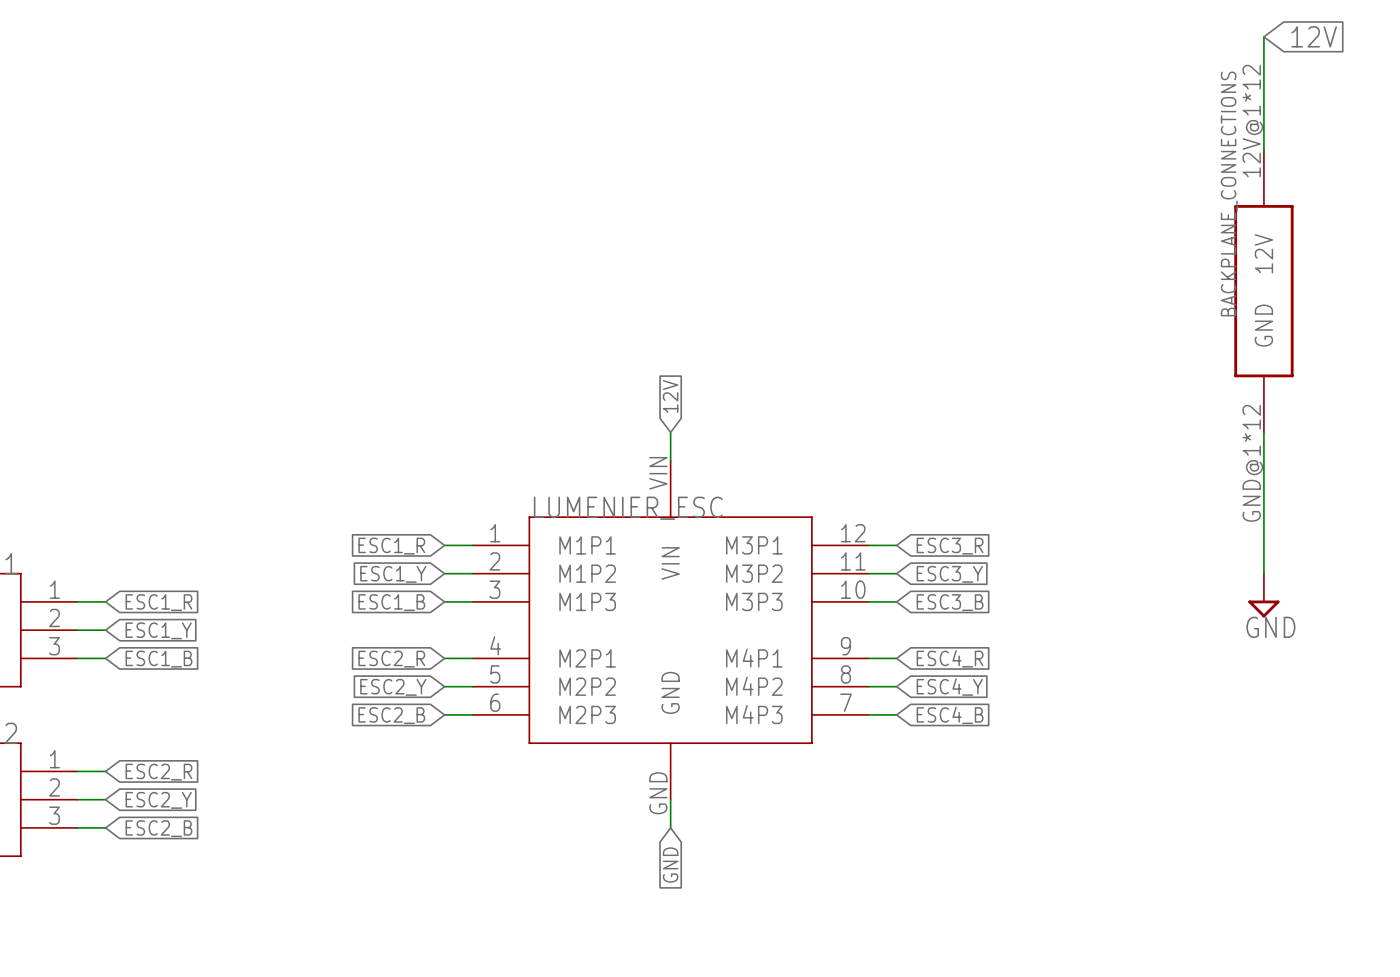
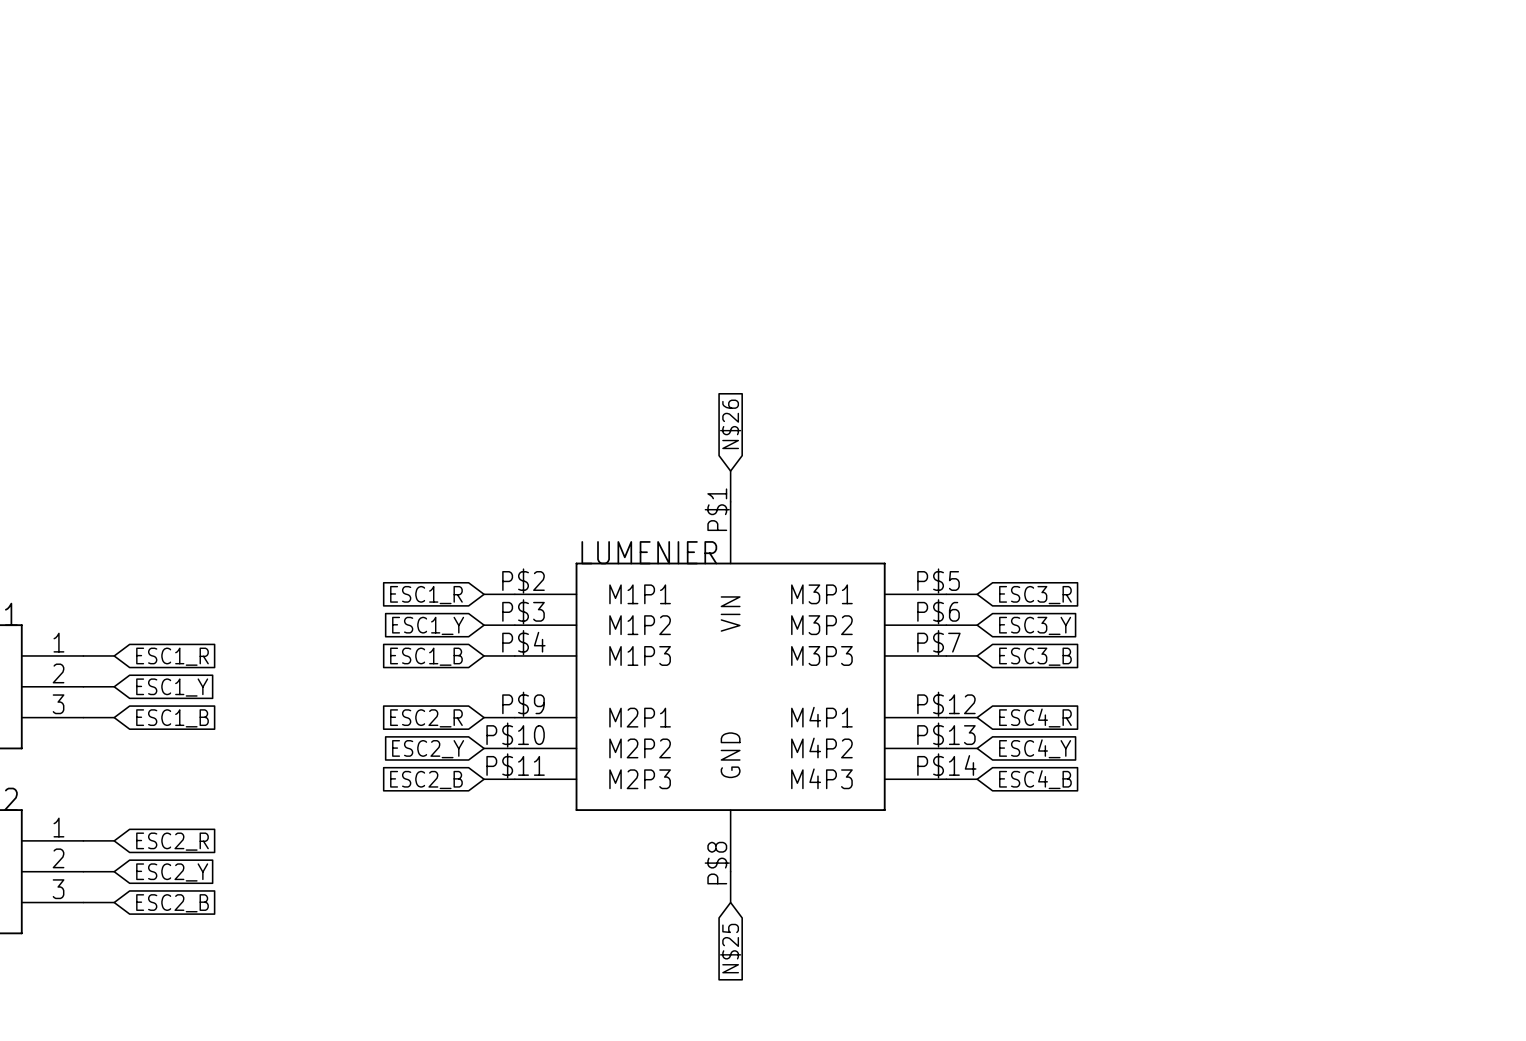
wire: (1263, 36) (1263, 149) -> none
global label: 12V (1314, 36) -> none
BACKPLANE_CONNECTIONS: (1263, 291) -> none
global label: 12V (670, 396) -> N$26 (730, 424)
wire: (1263, 432) (1263, 573) -> none
LUMENIER_ESC symbol: [472, 460, 869, 800] -> [514, 501, 947, 872]
LUMENIER_ESC name: LUMENIER_ESC (628, 508) -> LUMENIER (649, 552)
power symbol: GND (1263, 595) -> none
global label: GND (670, 865) -> N$25 (730, 948)

